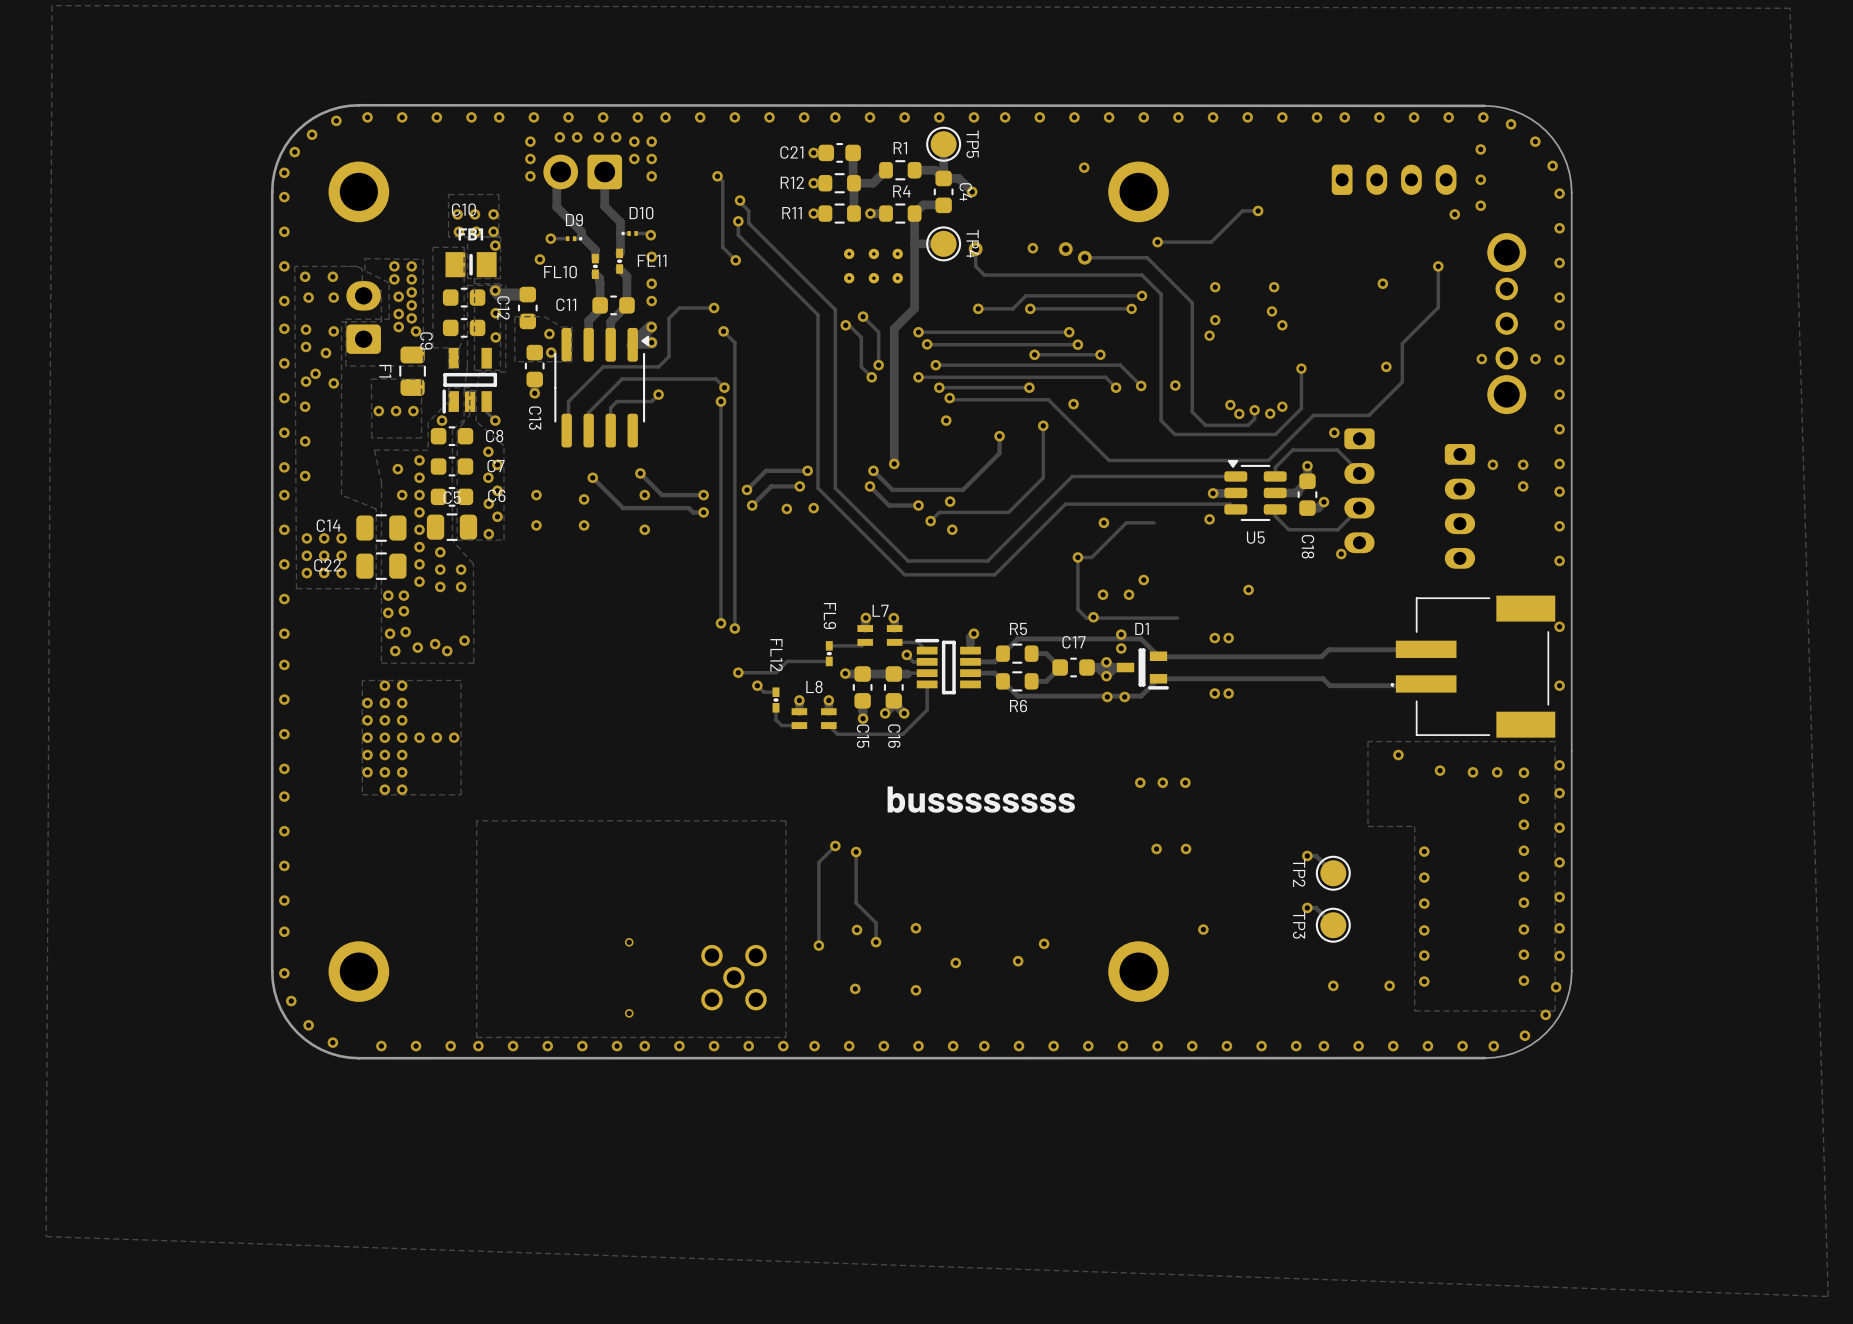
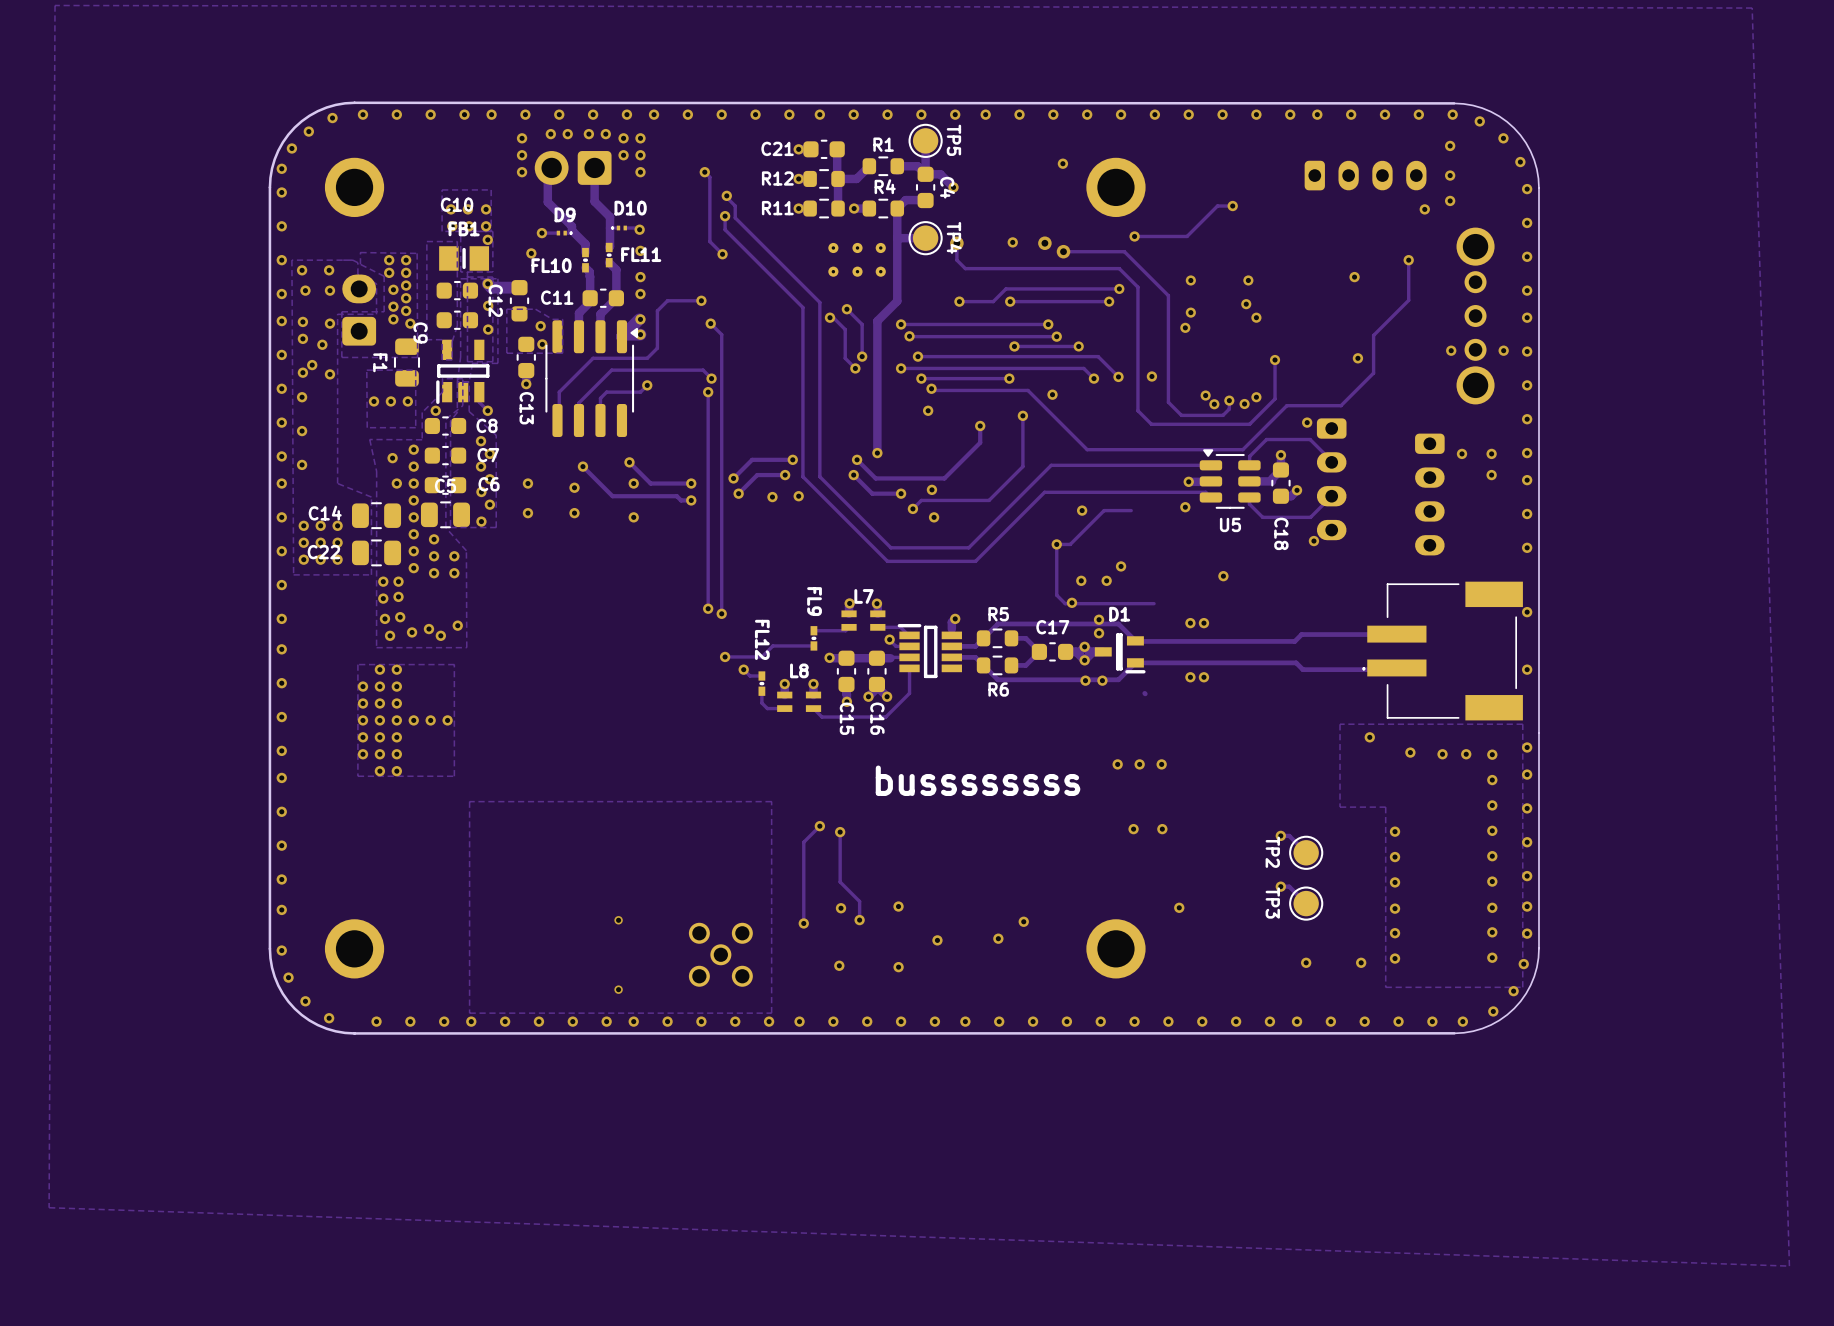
track: none -> (1144, 693) (1145, 693)

